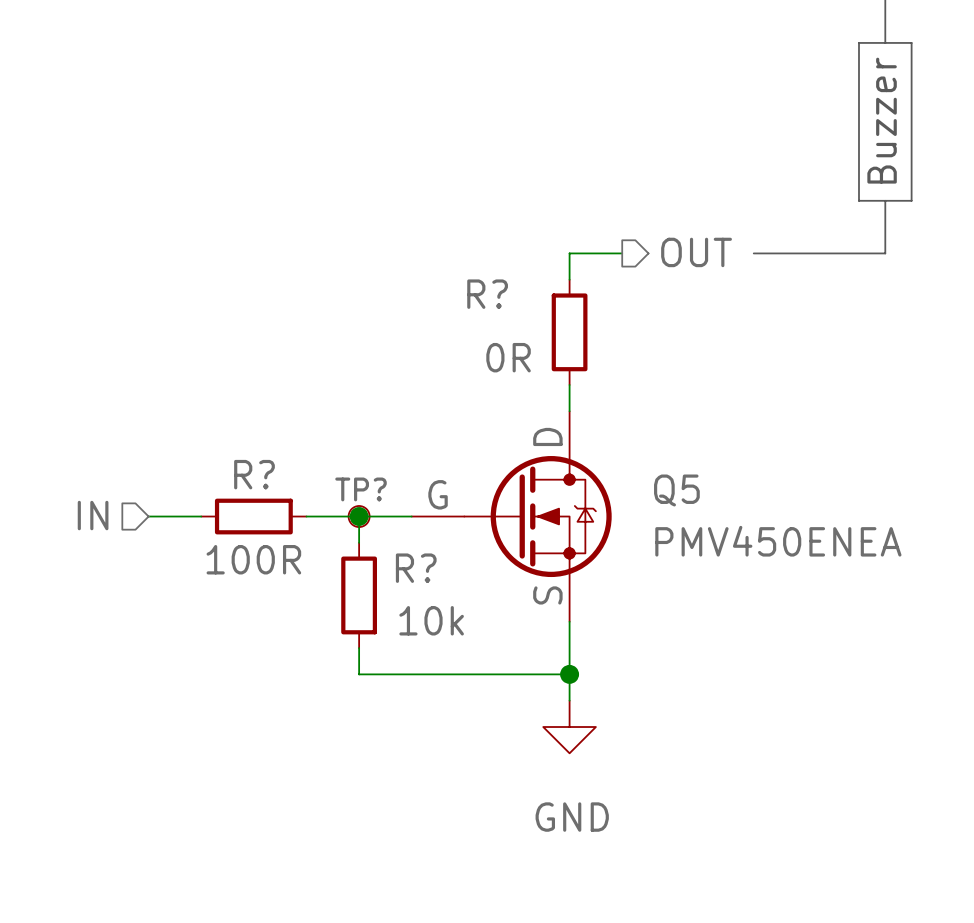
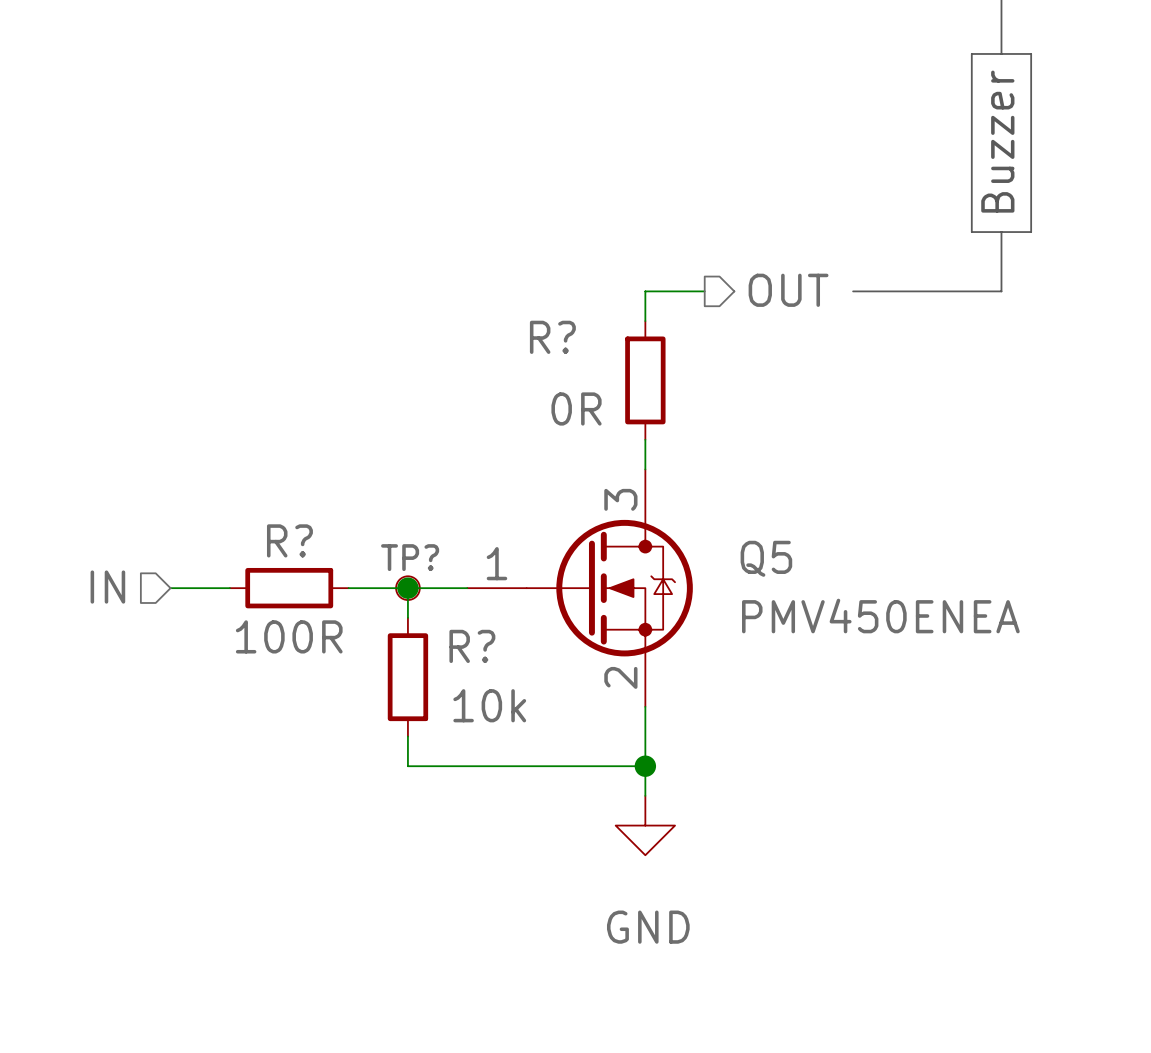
Q5 pin name: D (547, 436) -> none
Q5 pin number: none -> 3 (620, 499)
Q5 pin name: G (438, 494) -> none
Q5 pin number: none -> 1 (496, 563)
Q5 pin name: S (547, 595) -> none
Q5 pin number: none -> 2 (620, 677)

